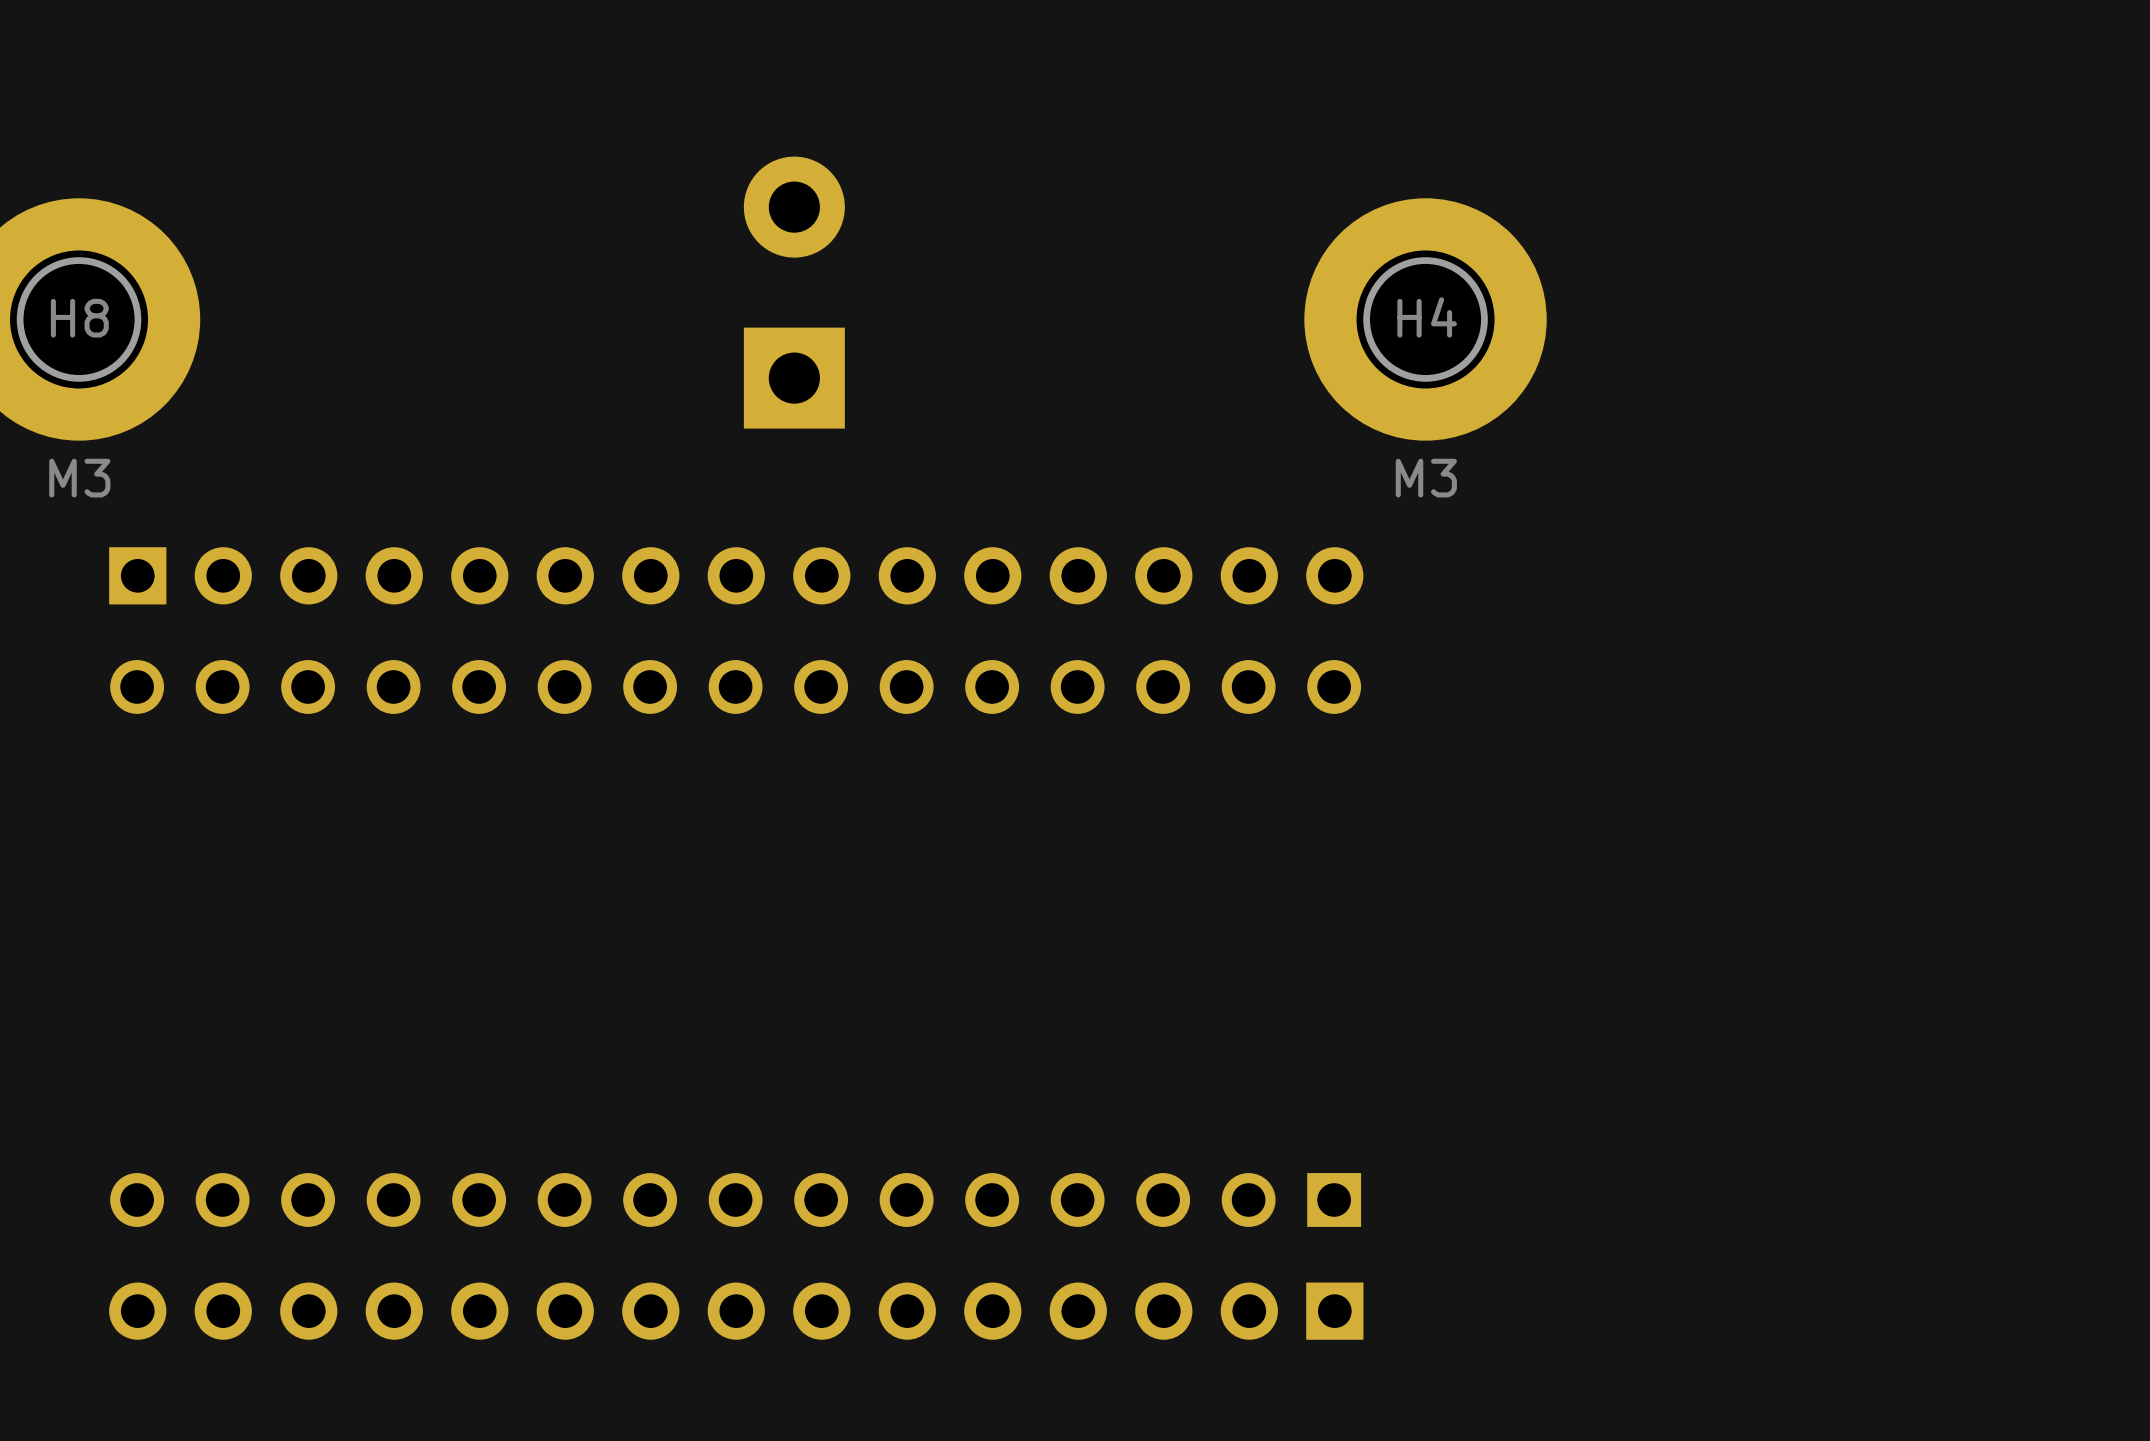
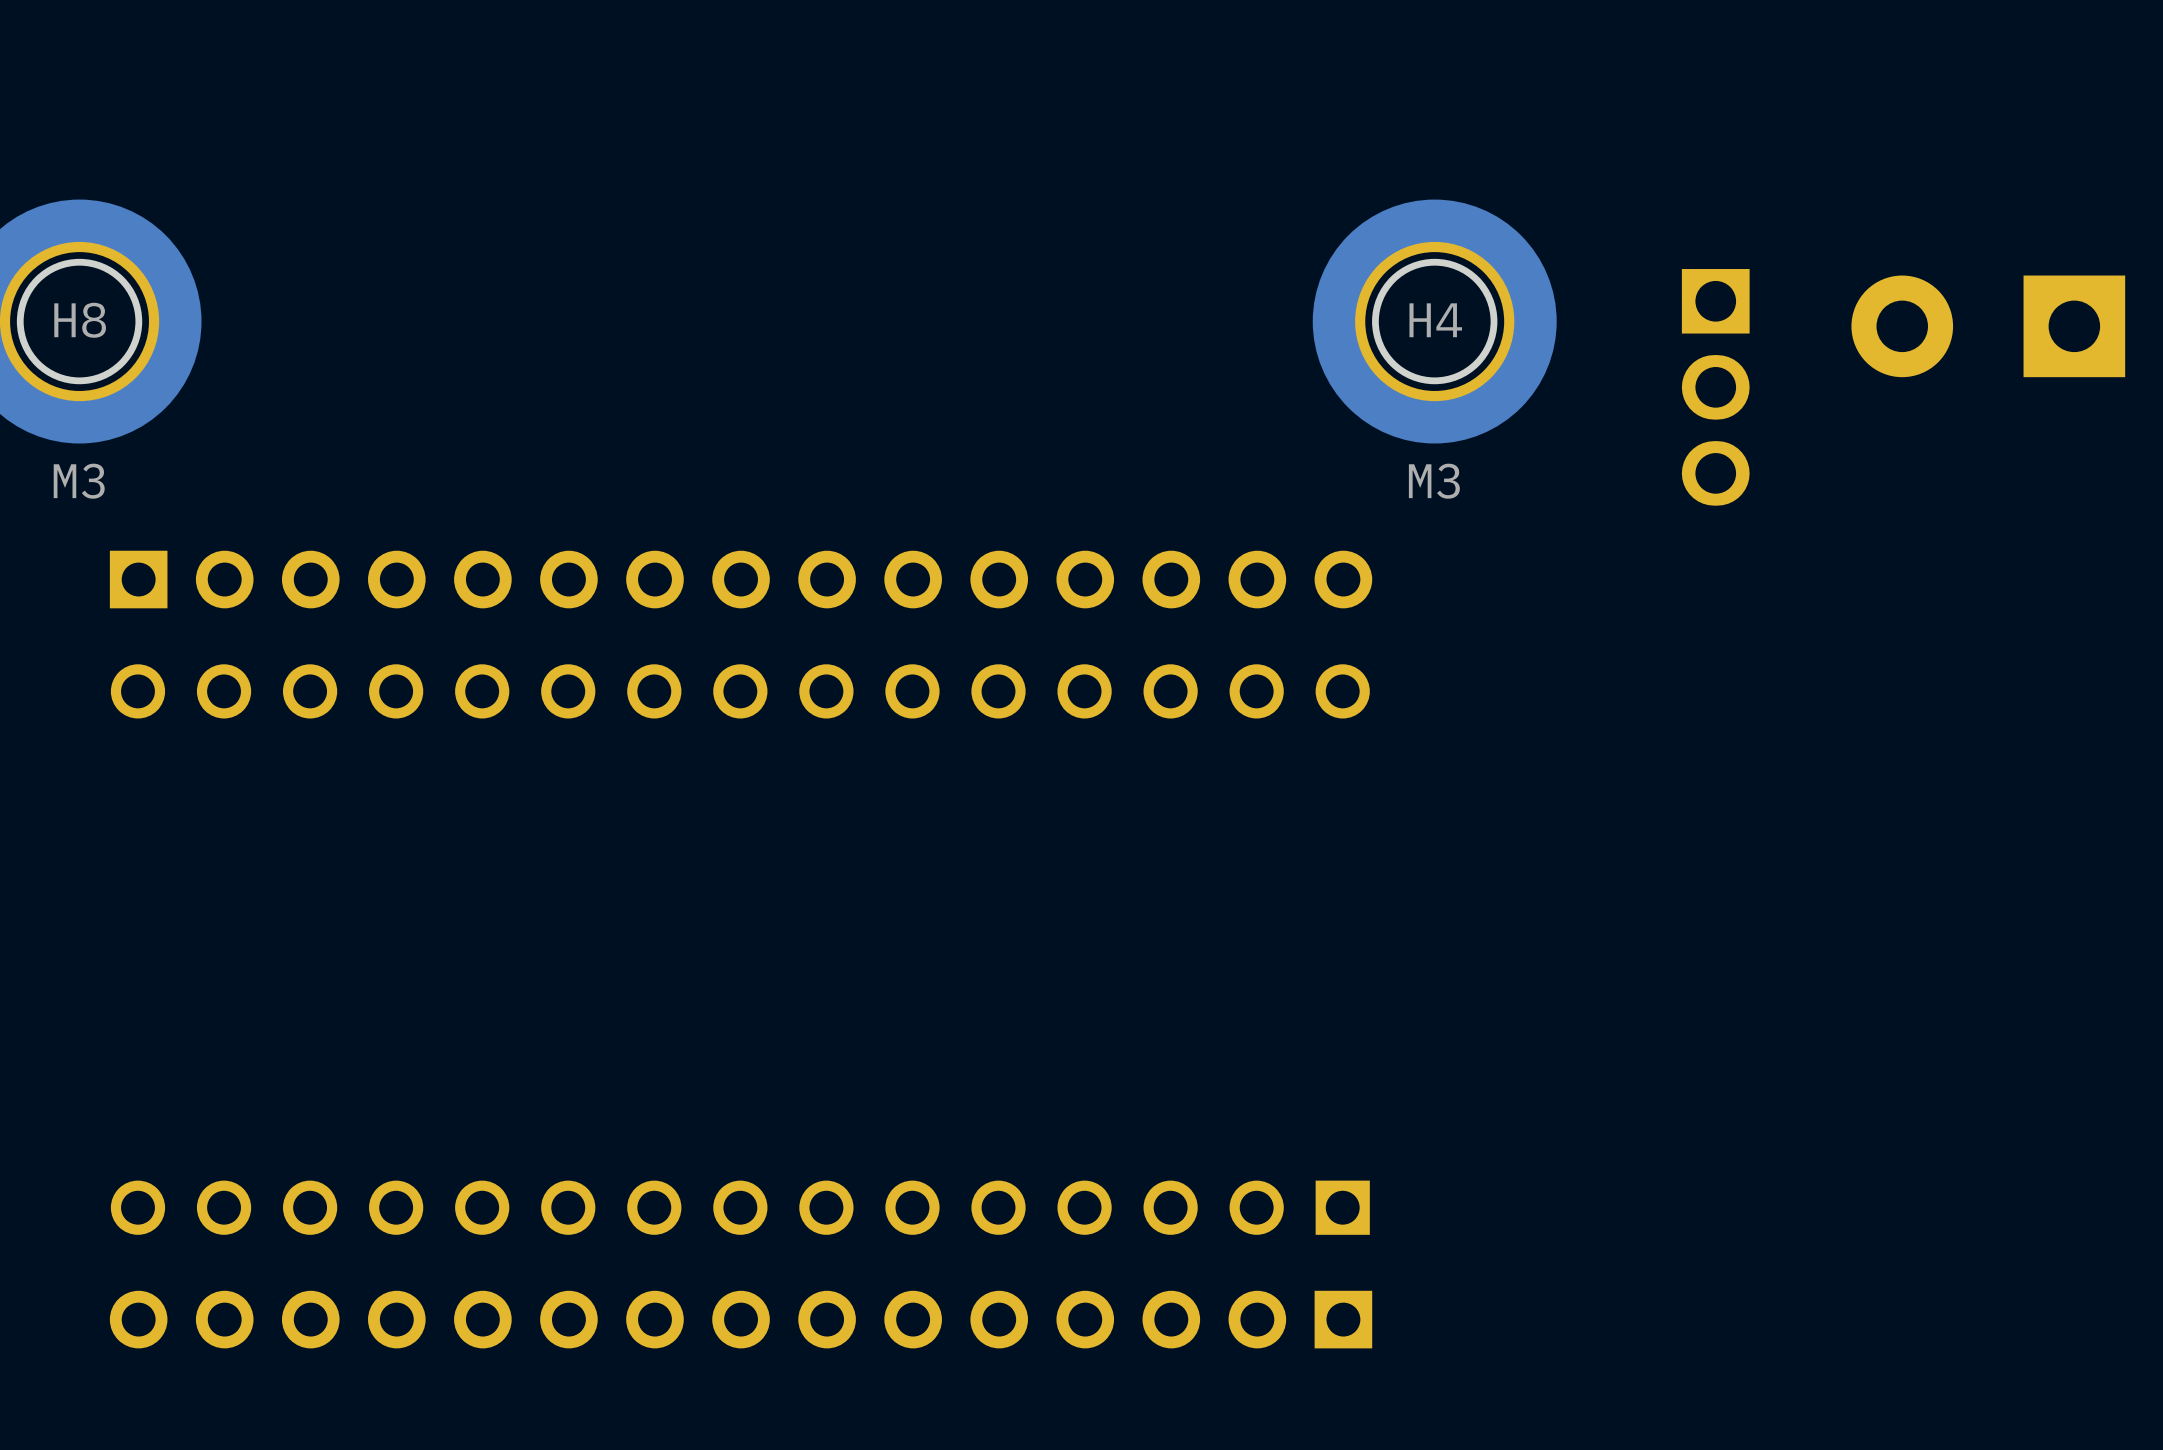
part: (794, 292) -> none
part: none -> (1988, 326)
part: none -> (1715, 387)

